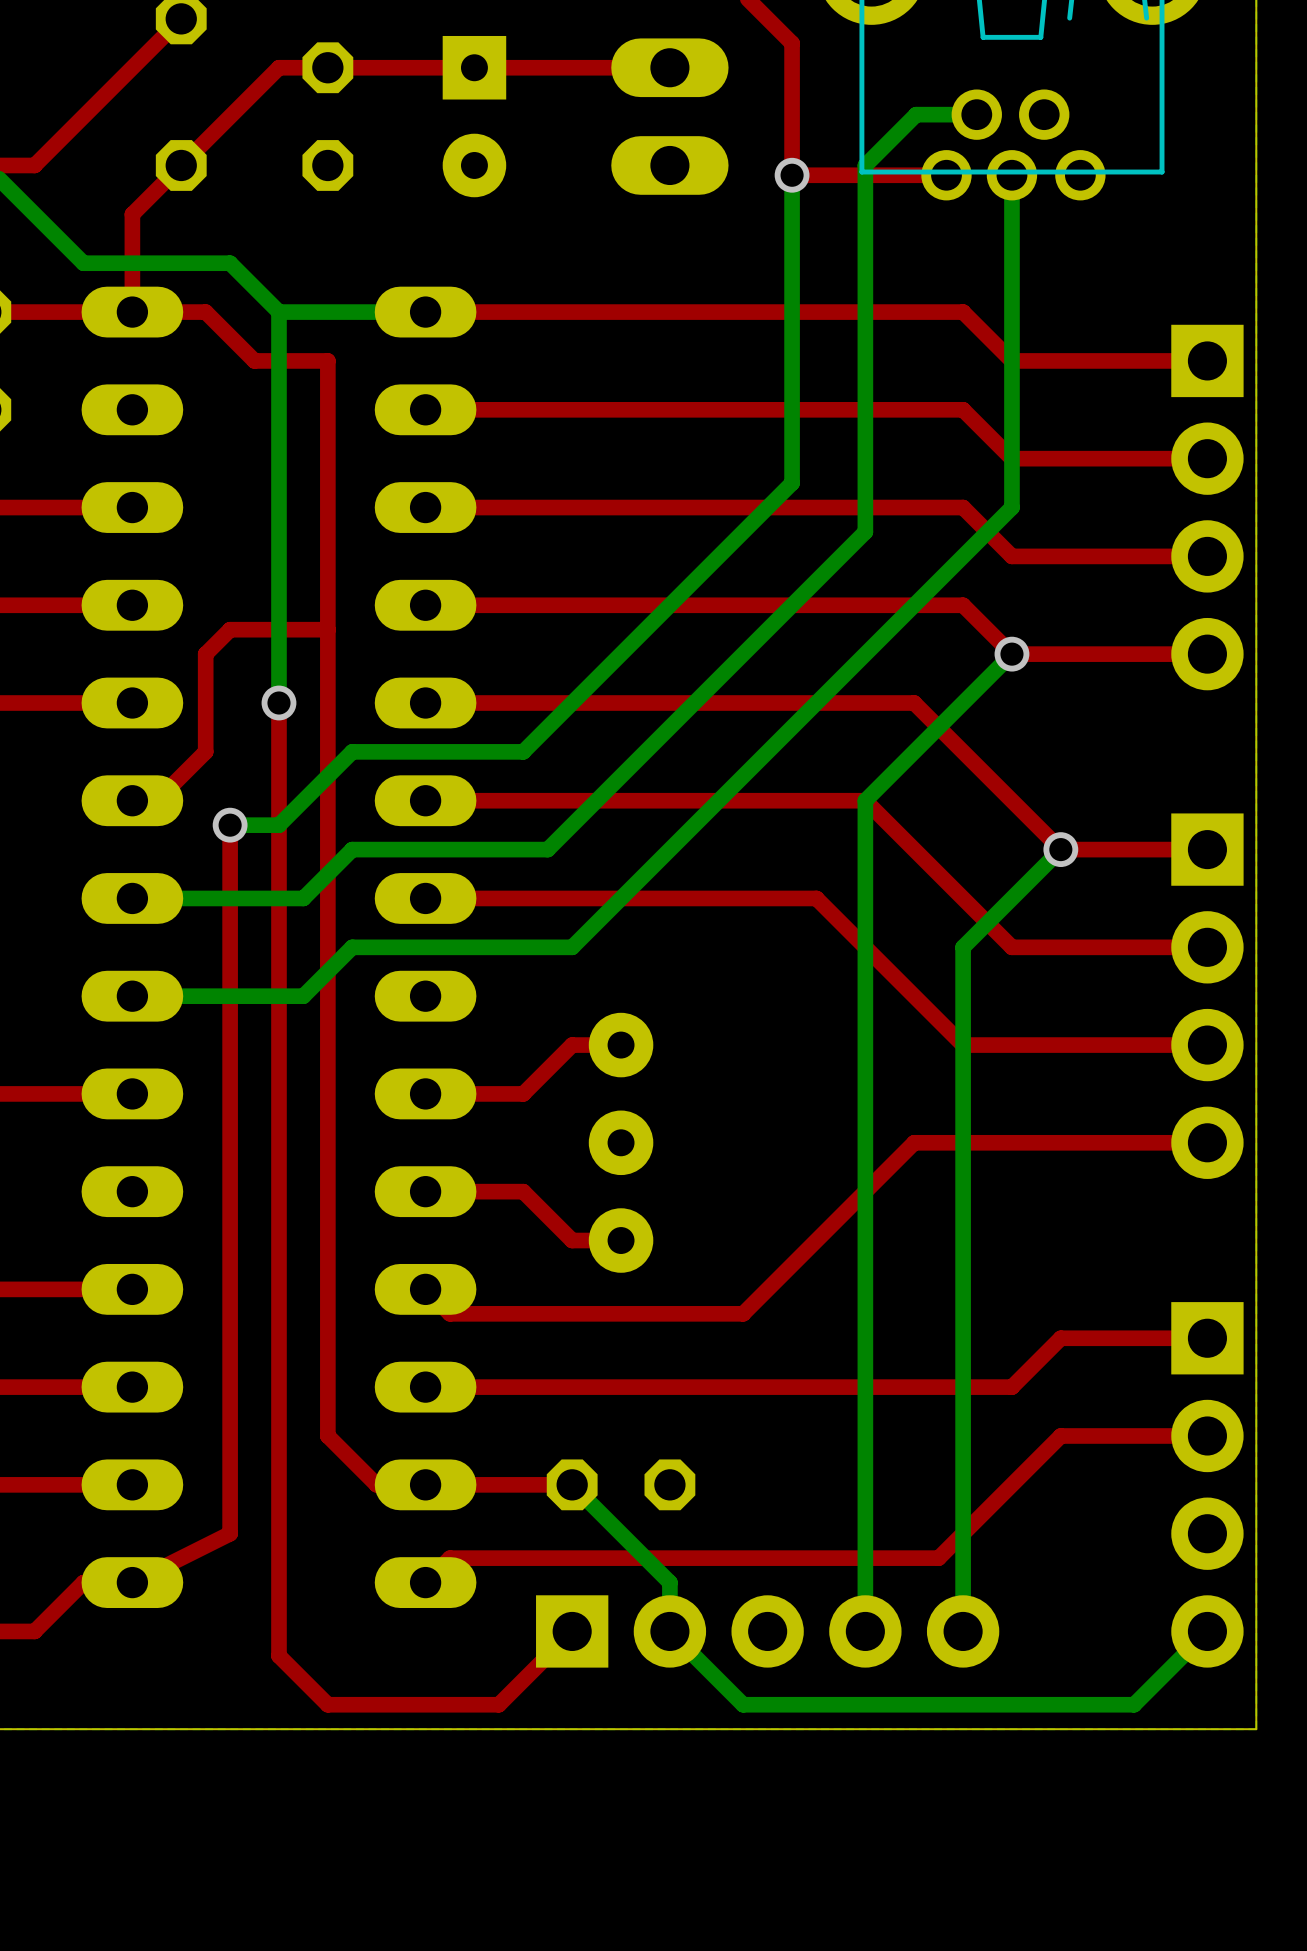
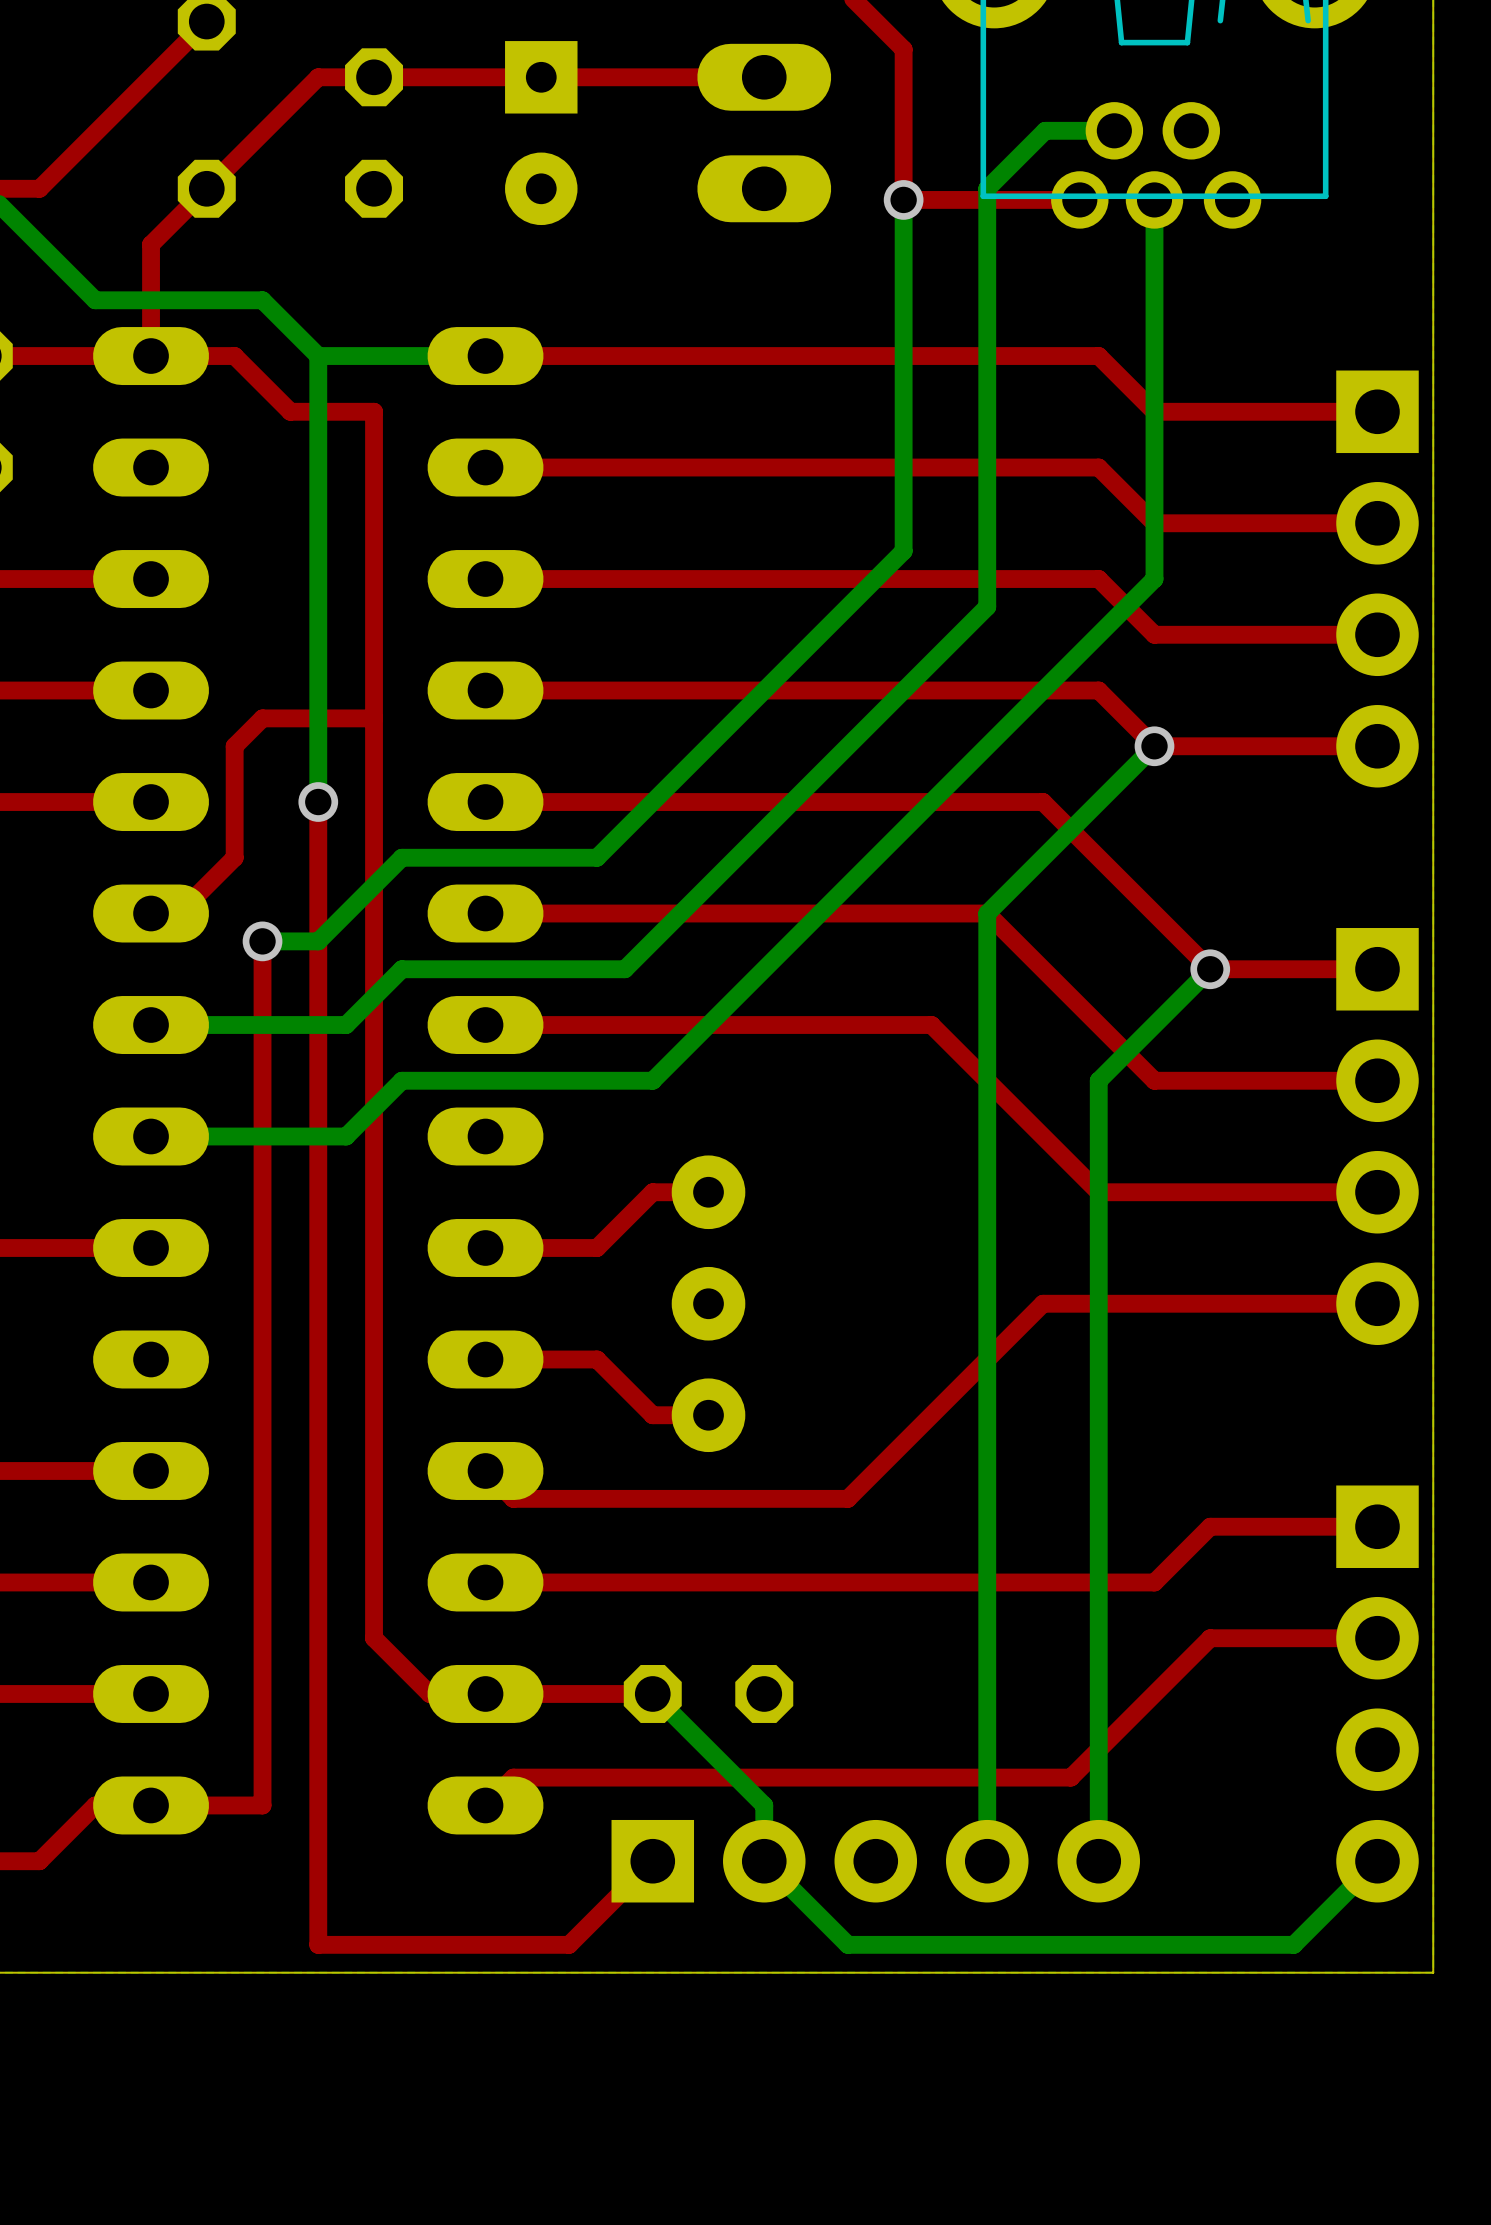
top track: (230, 1533) (132, 1582) -> (262, 1749) (262, 1805) (151, 1805)
top track: (278, 1655) (327, 1704) -> (318, 1889) (318, 1944) (374, 1944)

